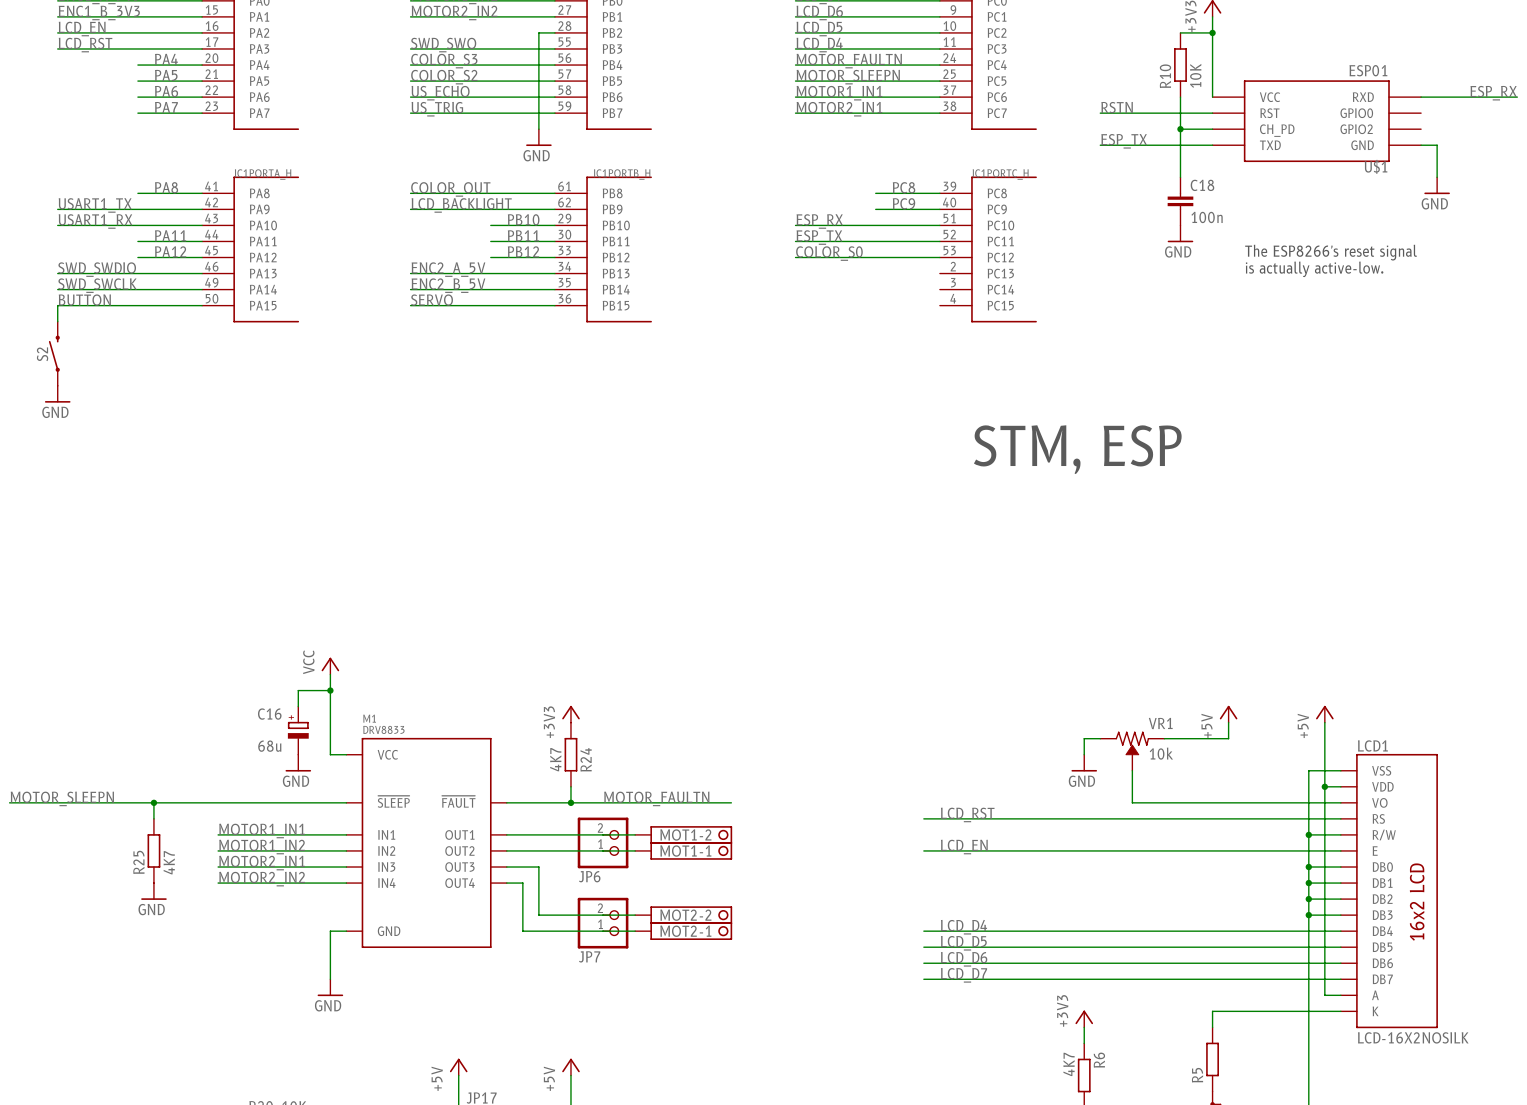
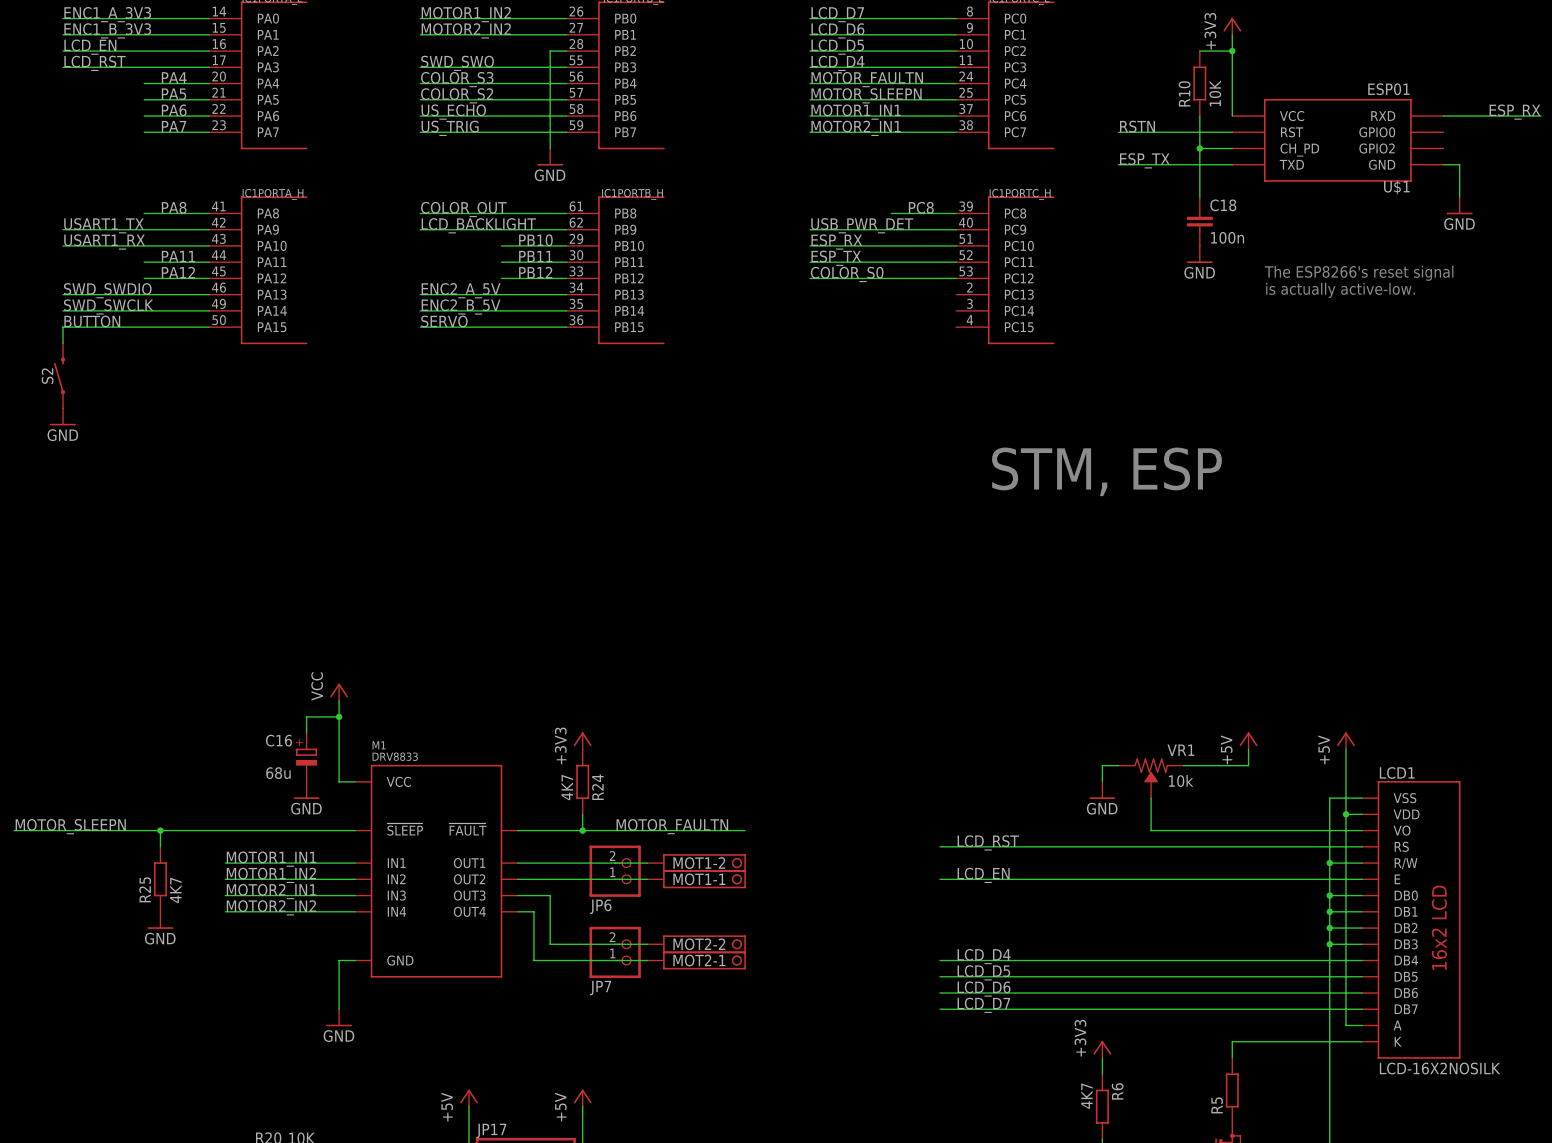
label: PC9 (903, 203) -> none
label: none -> USB_PWR_DET (862, 225)
wire: none -> (810, 229) (891, 229)

